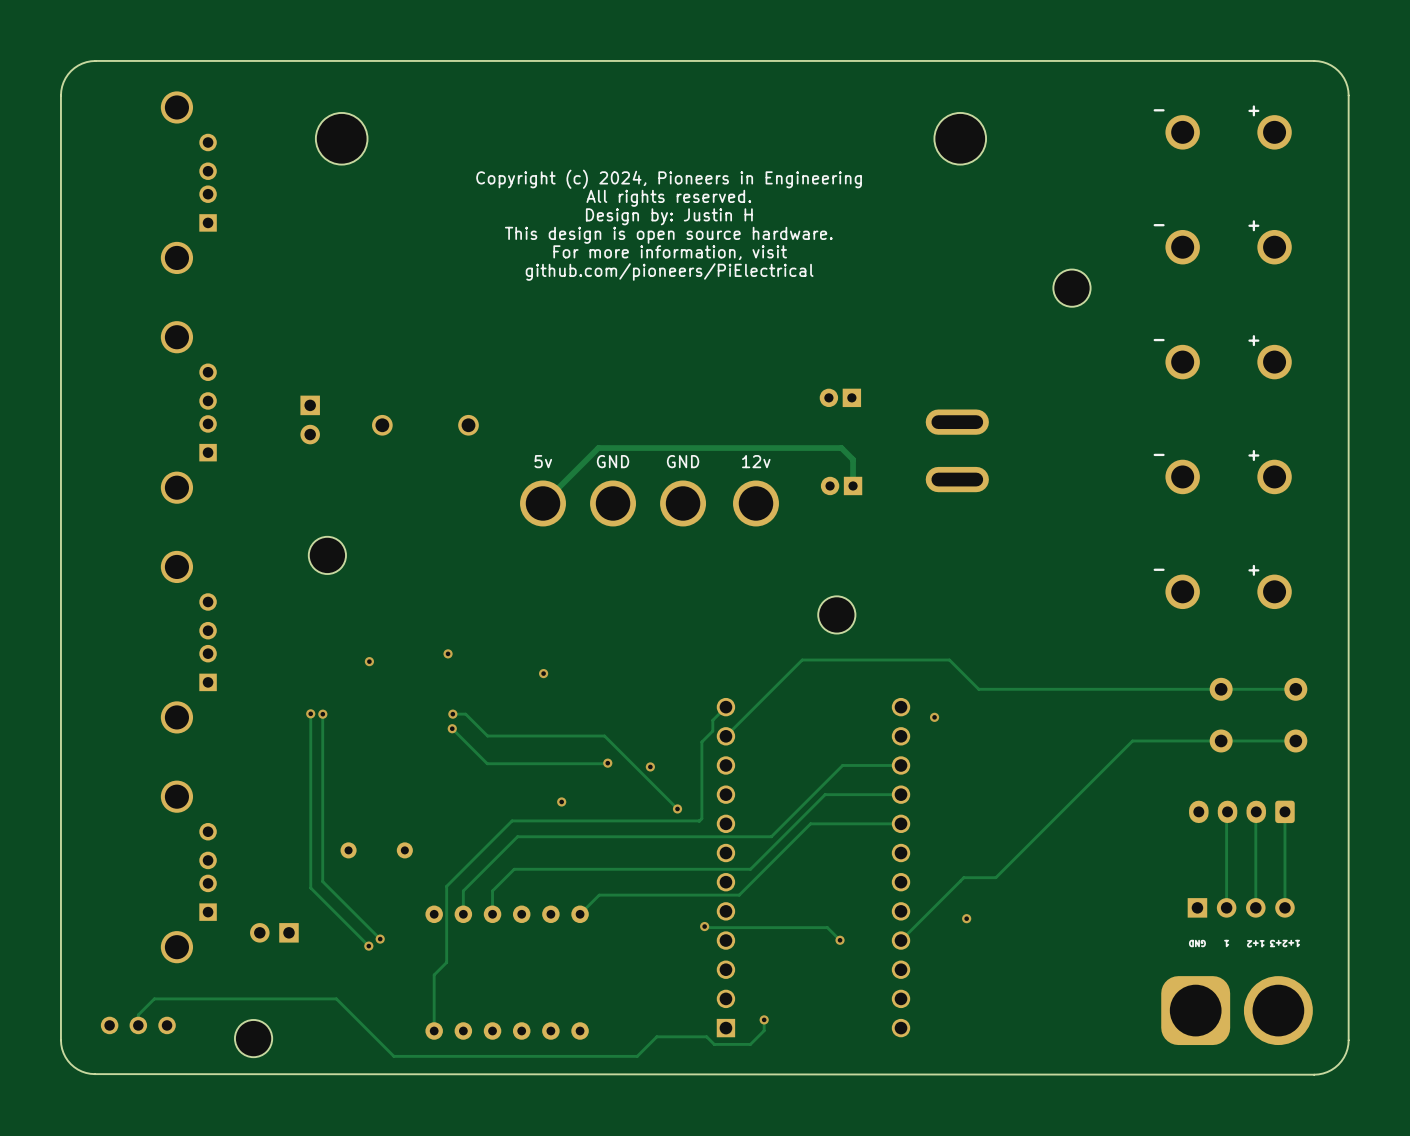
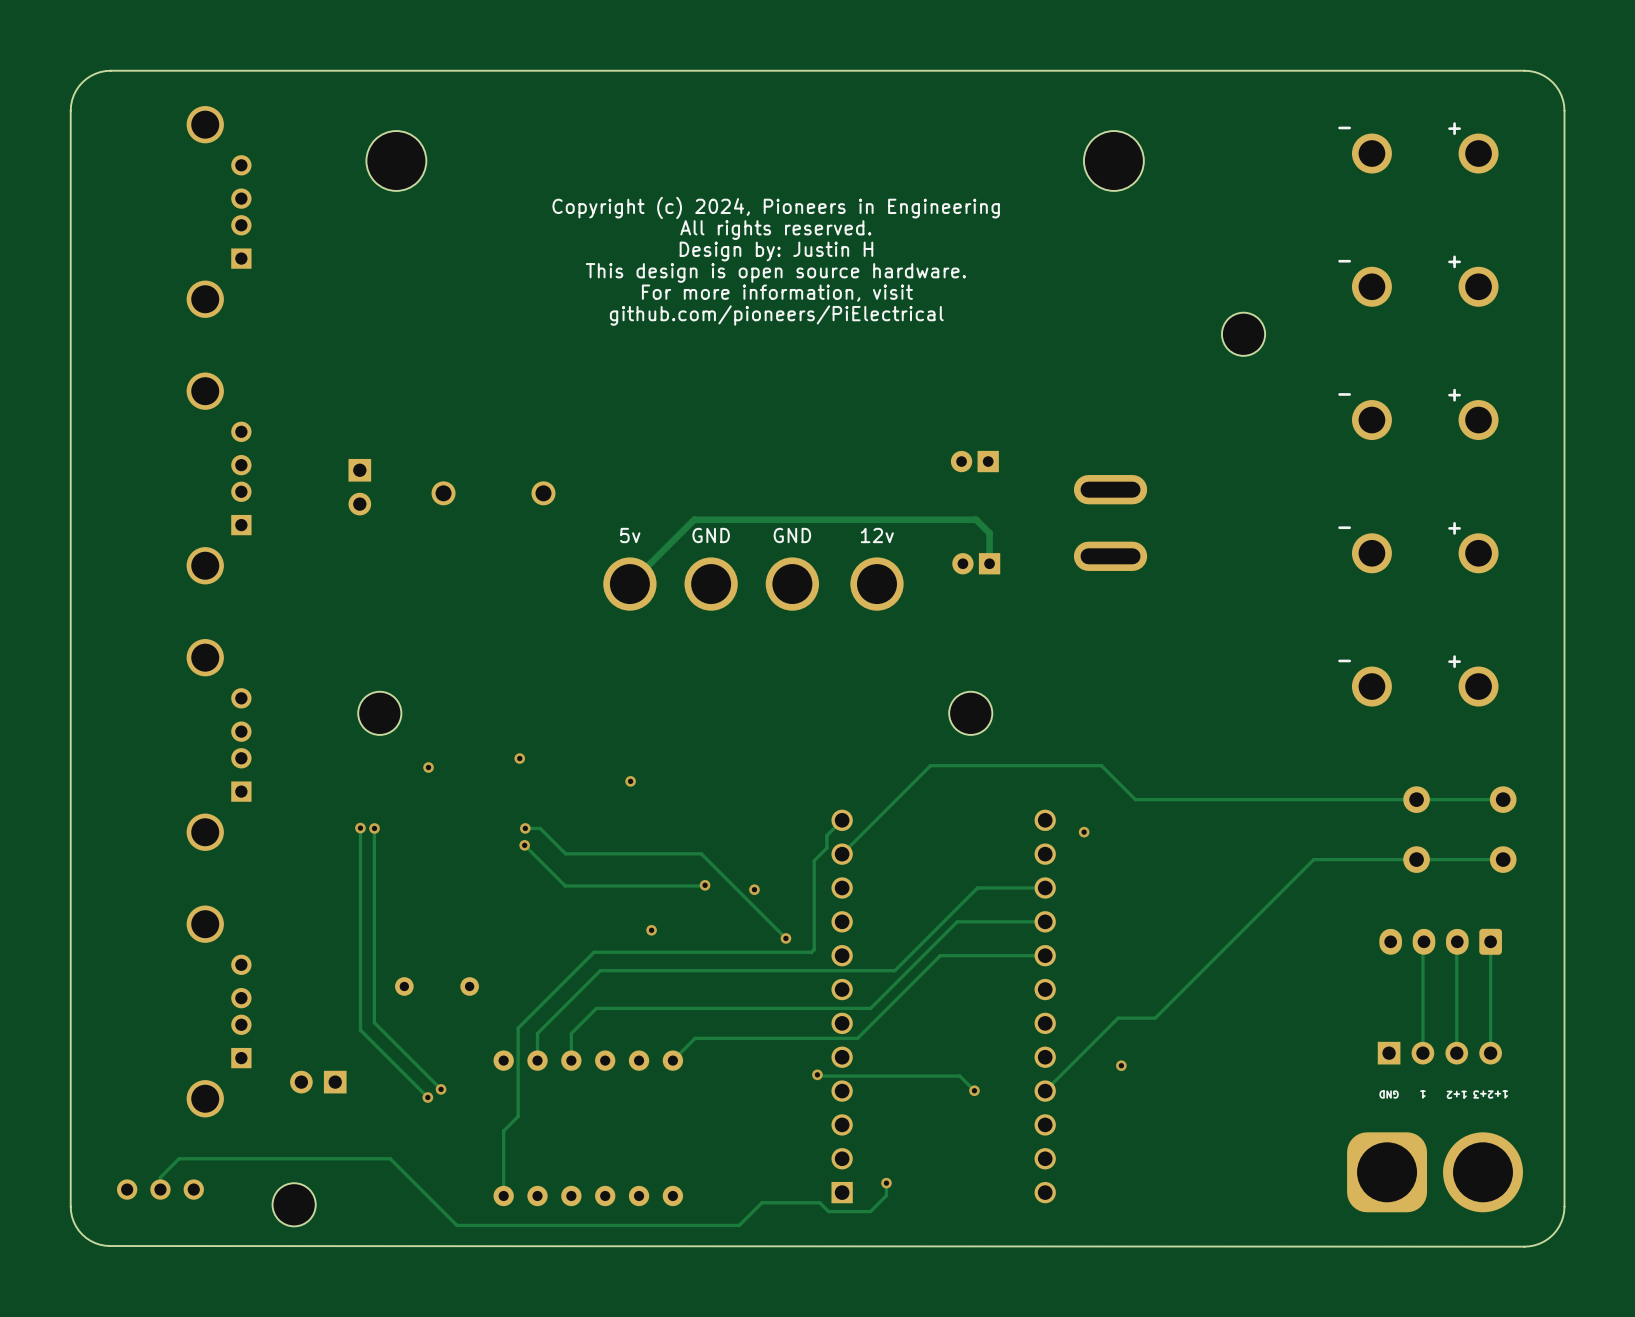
part position: (327, 555) -> (379, 713)

